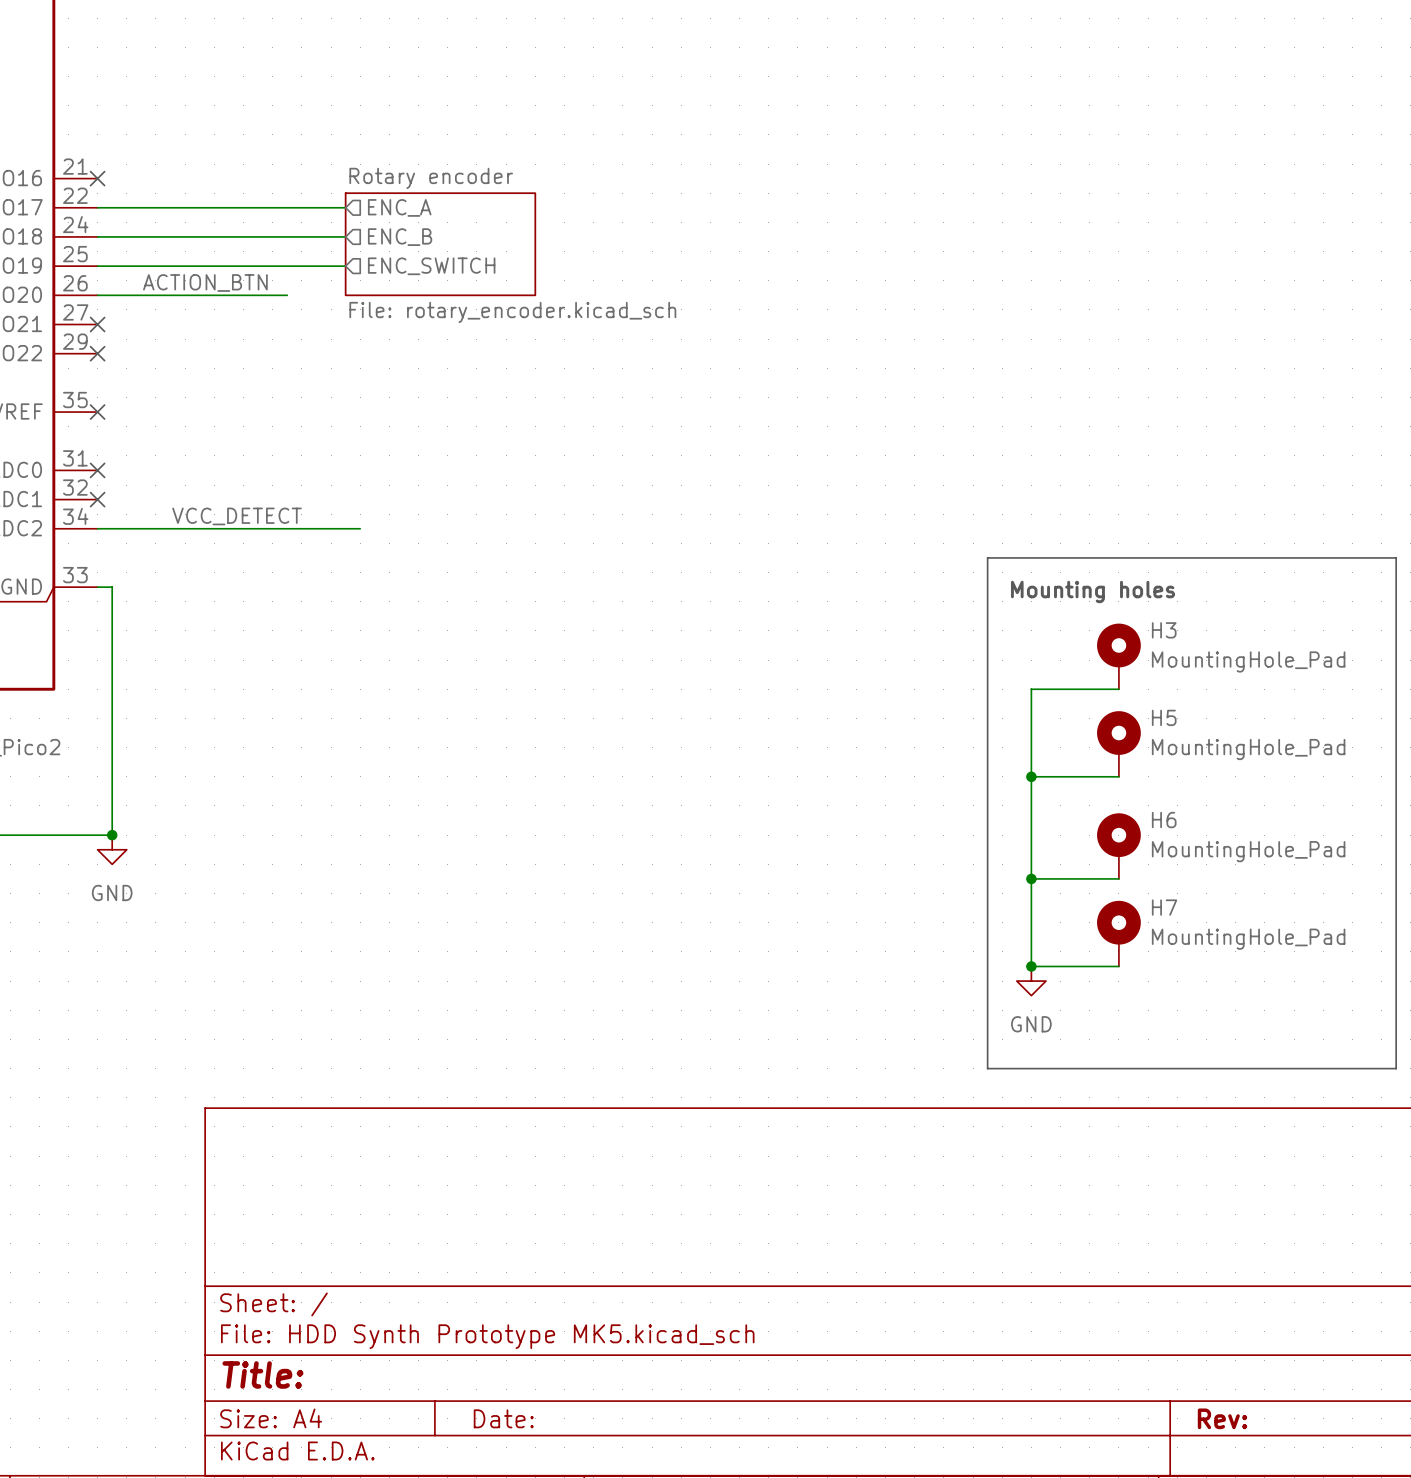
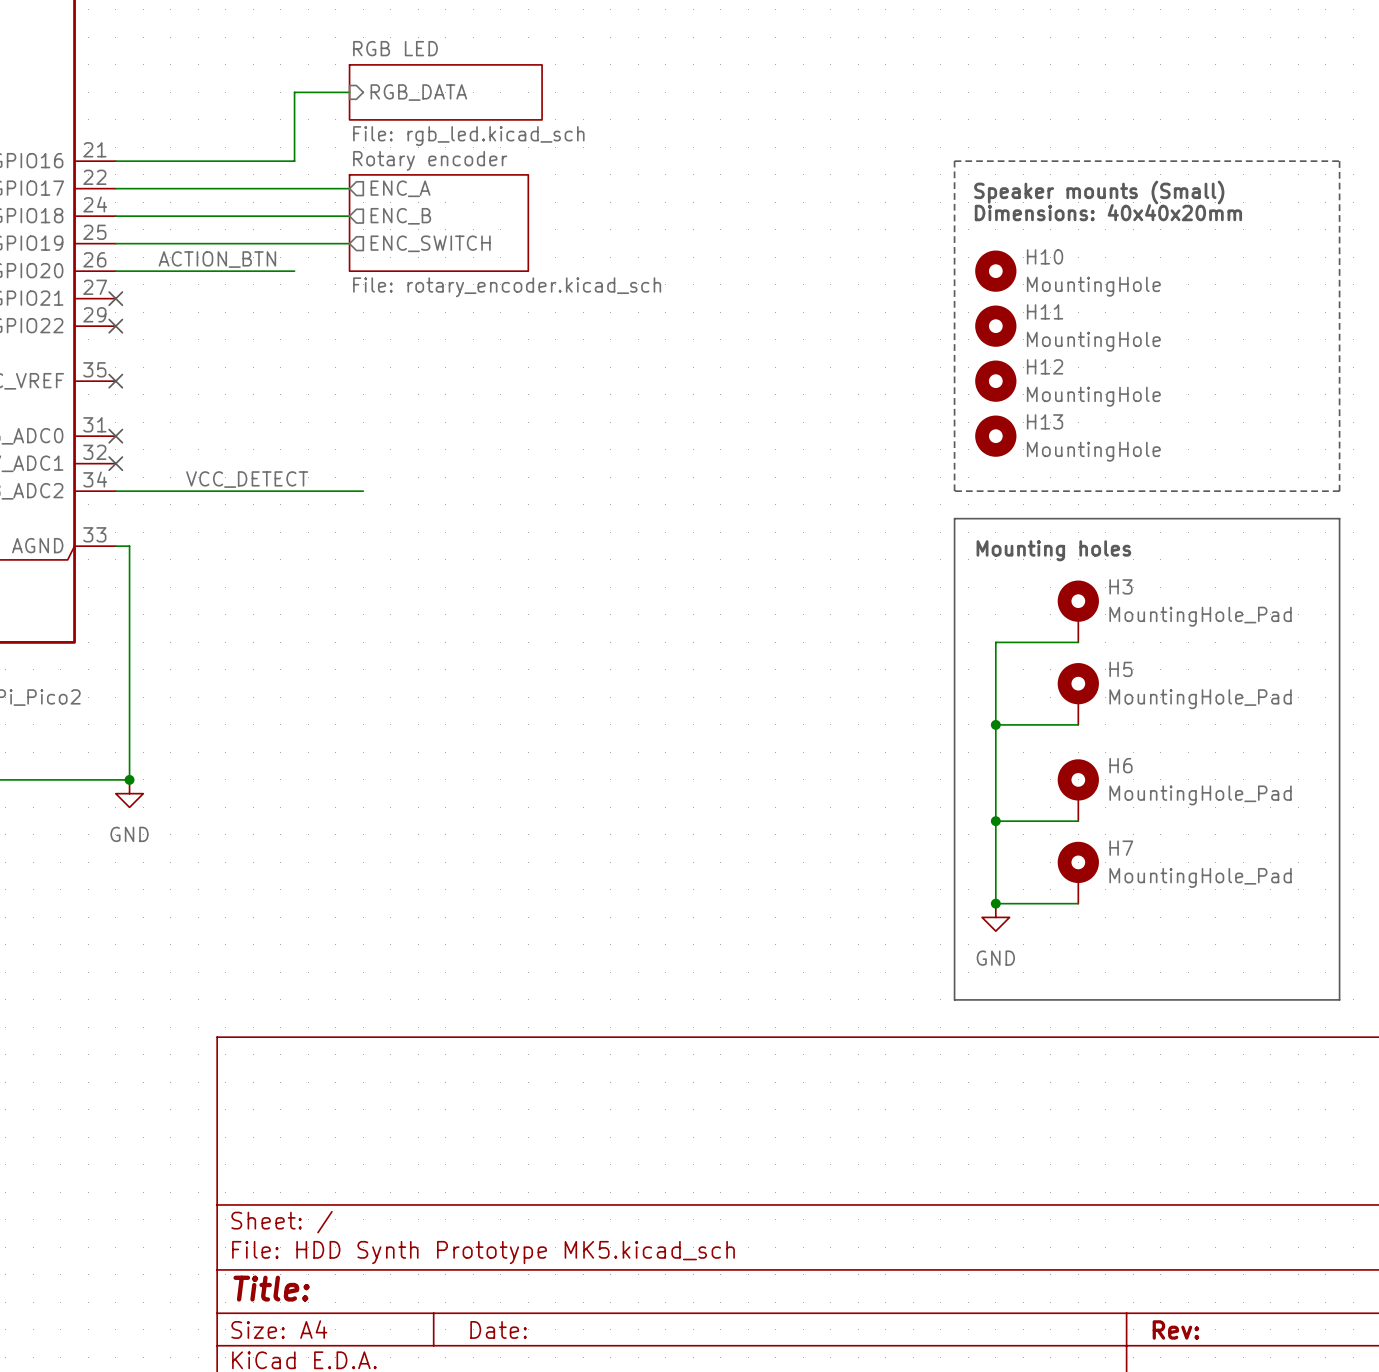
wire: none -> (349, 92) (294, 92) (294, 161) (115, 161)
sheet pin: none -> RGB_DATA (418, 92)
sheet RGB LED: none -> File: rgb_led.kicad_sch (445, 92)
no-connect mark: (97, 178) -> none
line: none -> (954, 161) (1339, 161) (1339, 491) (954, 491) (954, 161)
text: none -> Speaker mounts (Small) (1099, 192)
text: none -> Dimensions: 40x40x20mm (1108, 212)
H10: none -> MountingHole (995, 271)
H11: none -> MountingHole (995, 326)
H12: none -> MountingHole (995, 381)
H13: none -> MountingHole (995, 436)

